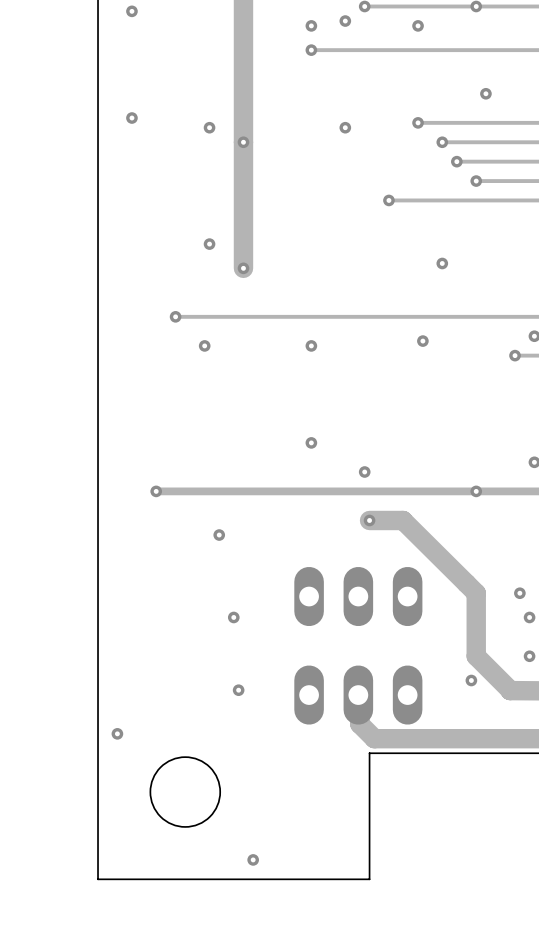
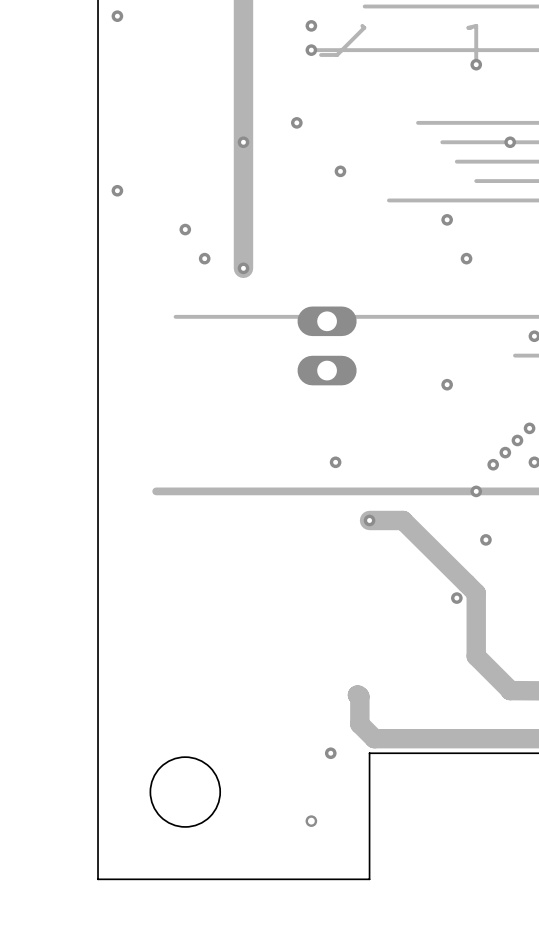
via: (364, 6) -> none
via: (476, 6) -> none
via position: (131, 11) -> (117, 16)
via: (345, 21) -> none
track: none -> (362, 25) (364, 27) (337, 54) (321, 54)
via: (418, 25) -> none
track: none -> (470, 27) (468, 27) (476, 25) (476, 64)
via: none -> (476, 64)
via: (485, 93) -> none
via: (131, 118) -> none
via: none -> (296, 122)
via: (418, 122) -> none
via: (209, 127) -> none
via: (345, 127) -> none
via: (442, 142) -> none
via: none -> (510, 142)
via: (456, 161) -> none
via: none -> (340, 171)
via: (476, 181) -> none
via: none -> (117, 190)
via: (388, 200) -> none
via: none -> (447, 219)
via: none -> (185, 229)
via: (209, 244) -> none
via: none -> (204, 258)
via: none -> (466, 258)
via: (442, 263) -> none
via: (175, 316) -> none
via: (422, 341) -> none
via: (204, 345) -> none
via: (311, 345) -> none
part: none -> (327, 345)
via: (515, 355) -> none
via: none -> (447, 384)
via: none -> (529, 428)
via: none -> (517, 440)
via: (311, 442) -> none
via: none -> (505, 452)
via: none -> (335, 462)
via: none -> (493, 464)
via: (364, 472) -> none
via: (156, 491) -> none
via: (219, 535) -> none
via: none -> (485, 539)
via: (519, 593) -> none
part: (358, 596) -> none
via: none -> (456, 598)
via: (233, 617) -> none
via: (529, 617) -> none
via: (529, 656) -> none
via: (471, 680) -> none
via: (238, 690) -> none
part: (358, 695) -> none
via: (117, 733) -> none
via: none -> (330, 753)
via: none -> (311, 821)
via: (253, 859) -> none

